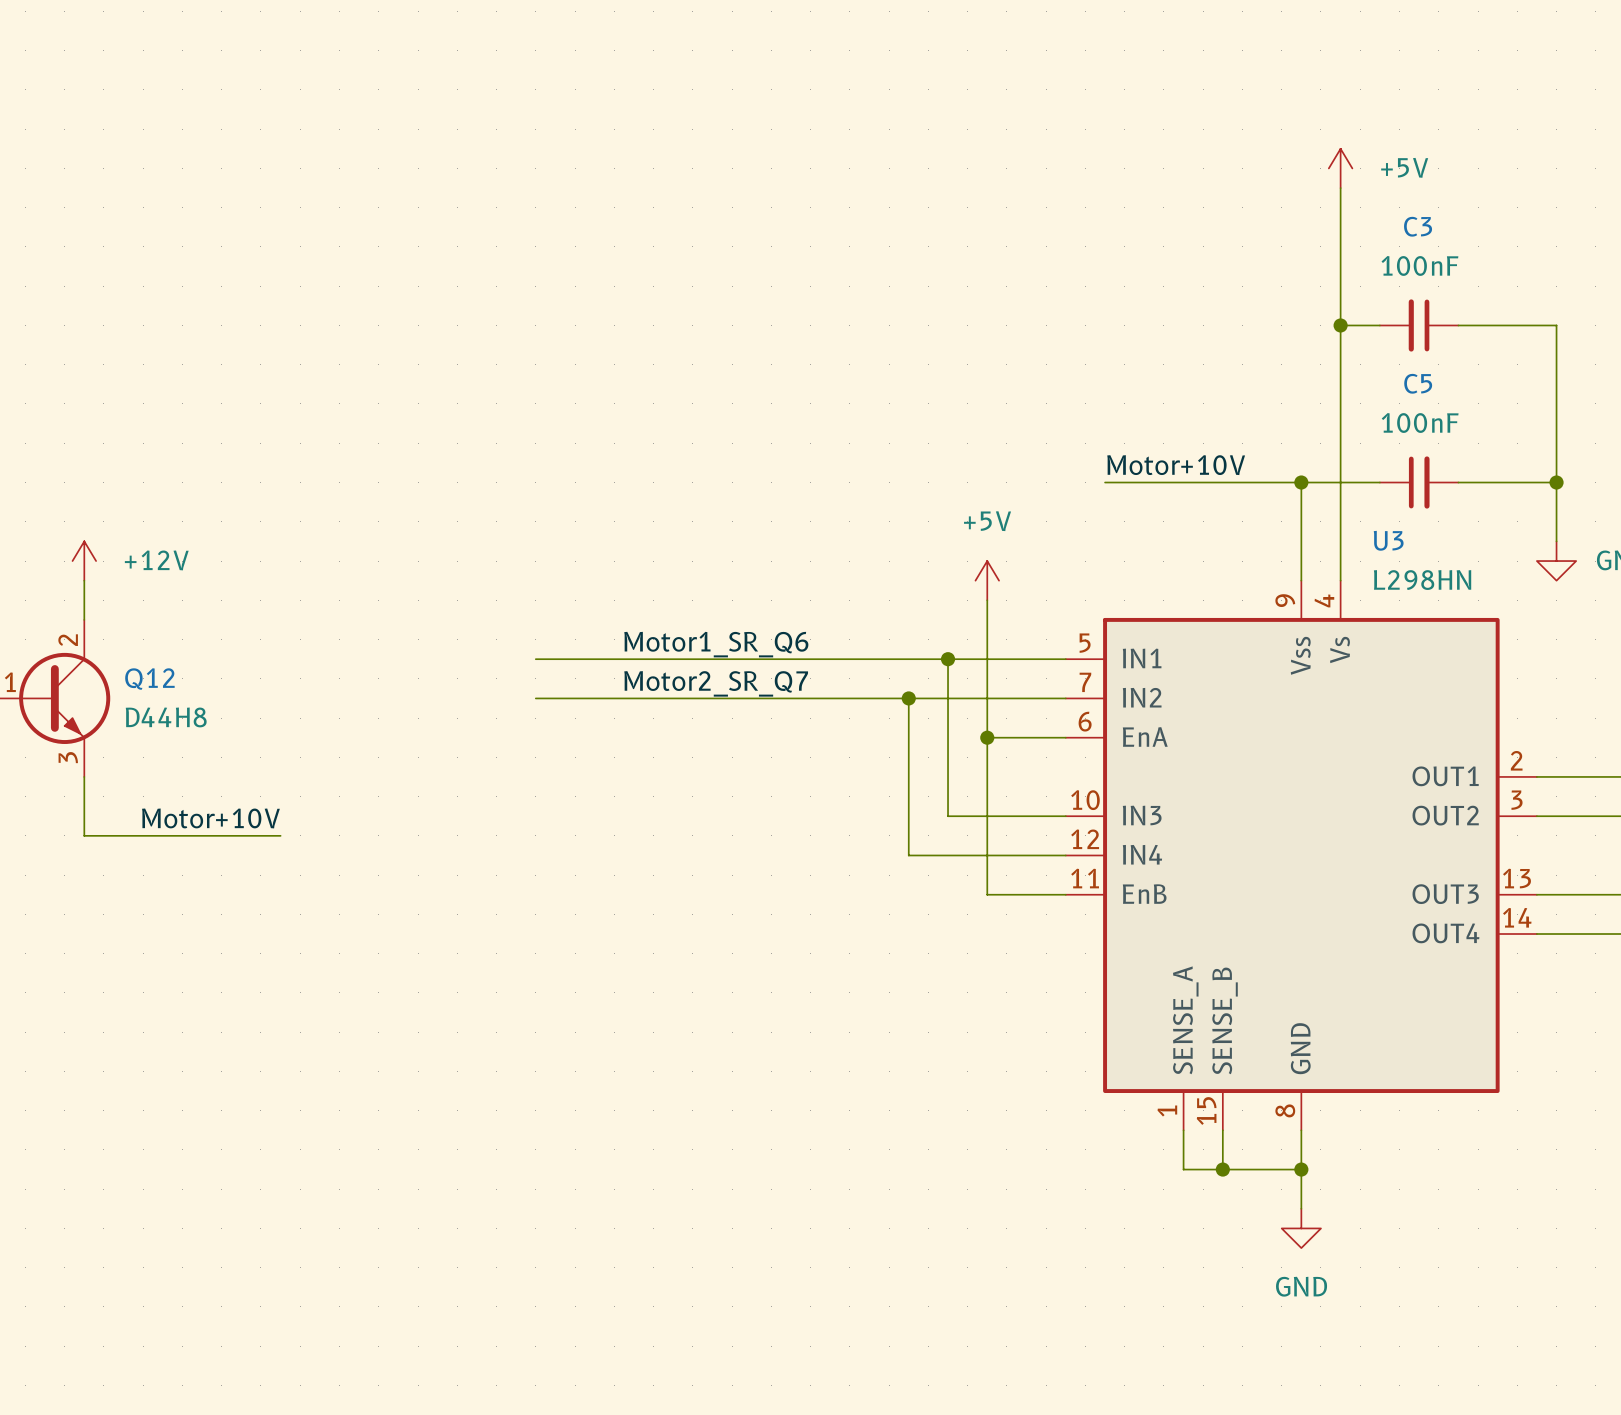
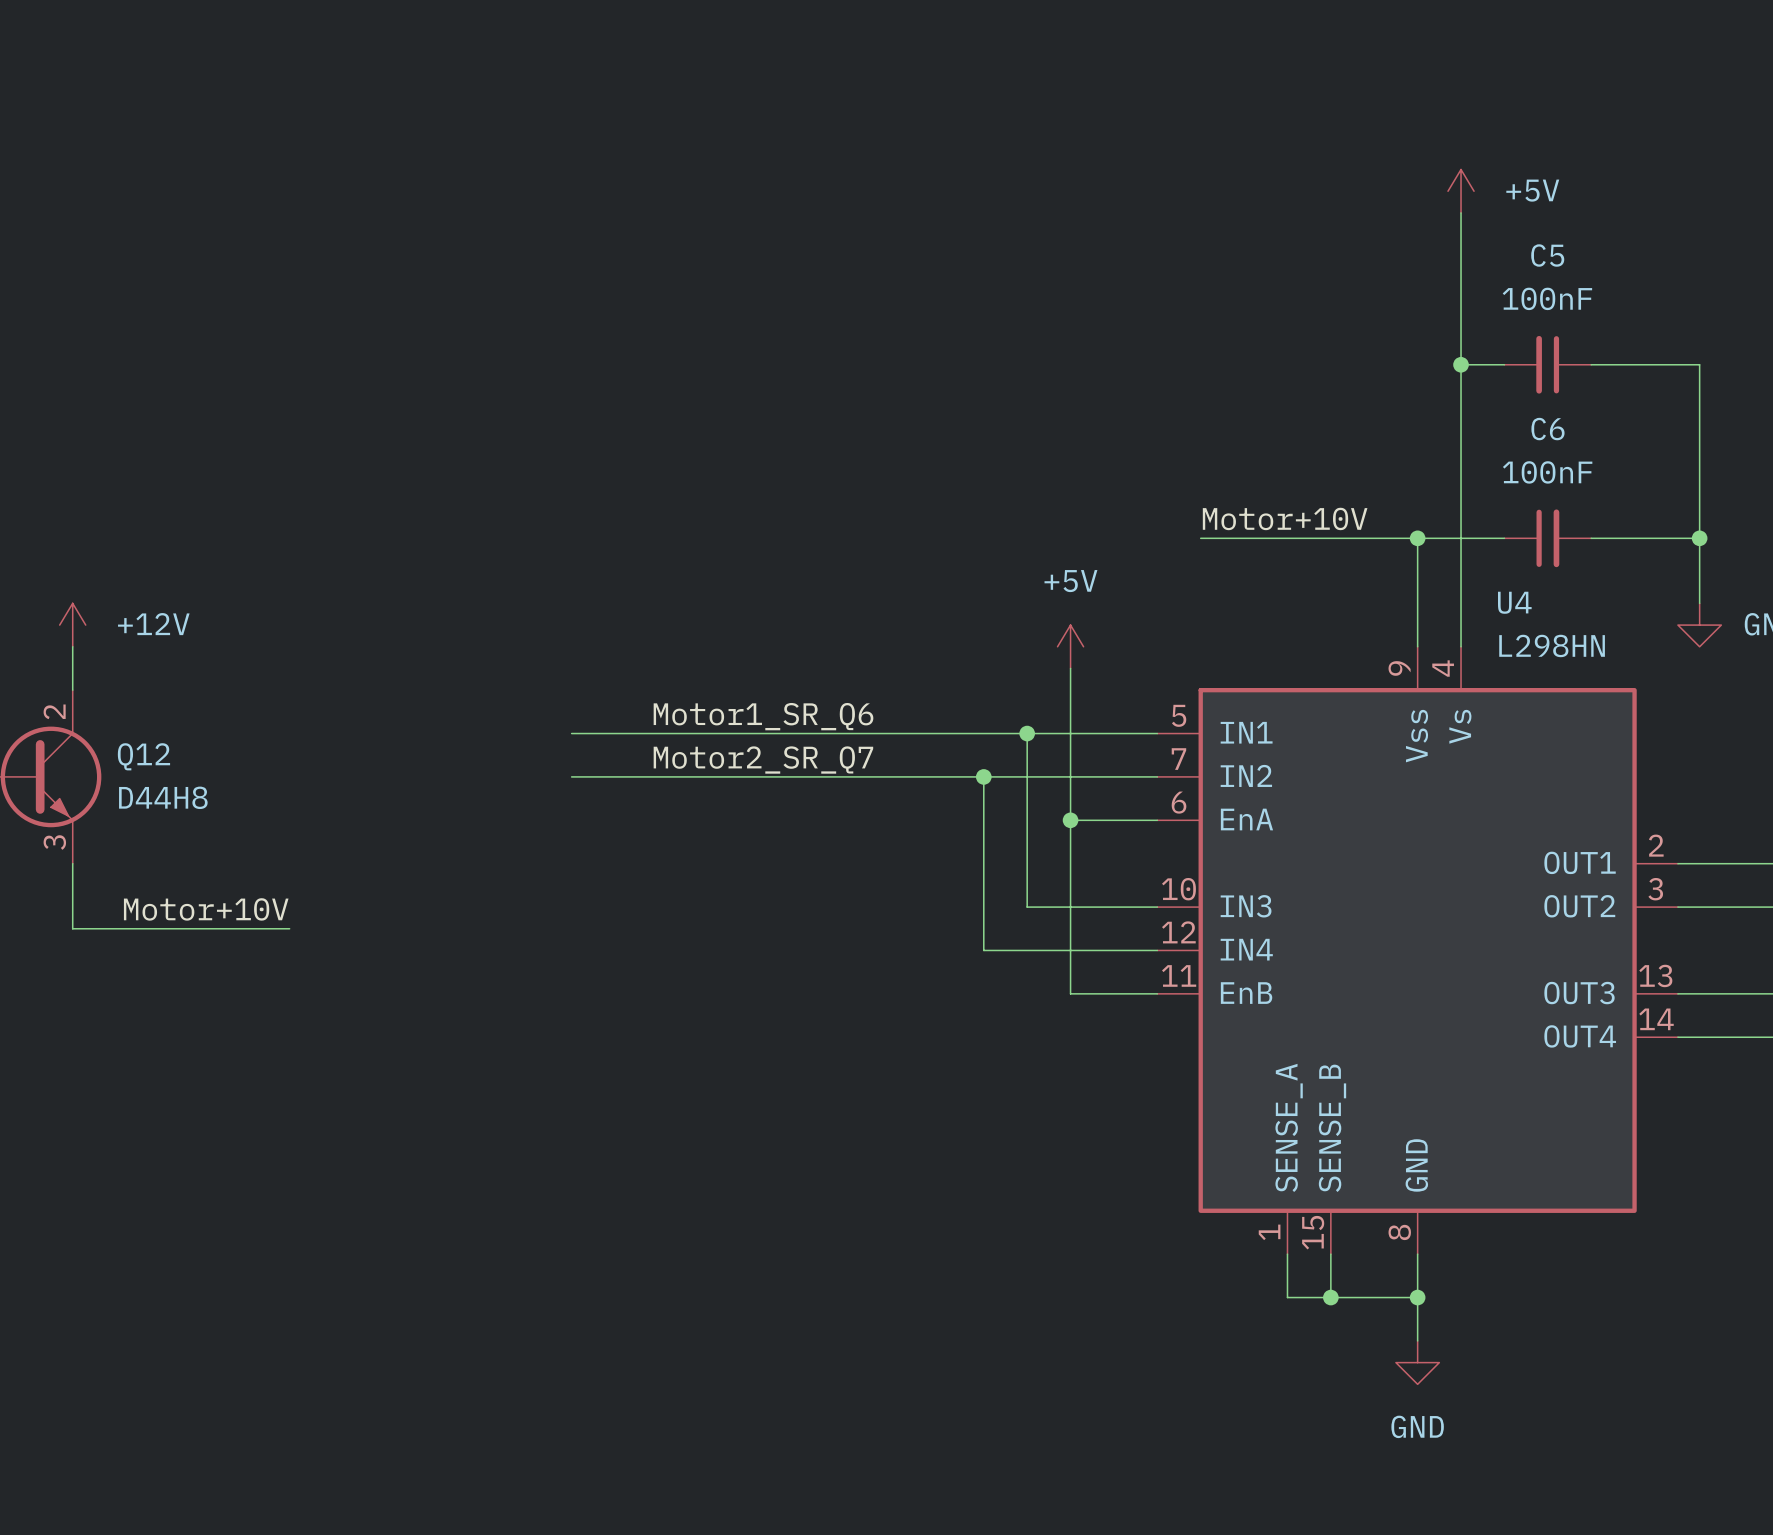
C3 name: C3 (1418, 226) -> C5 (1547, 255)
C5 name: C5 (1418, 383) -> C6 (1547, 429)
U3 name: U3 (1388, 540) -> U4 (1514, 602)

